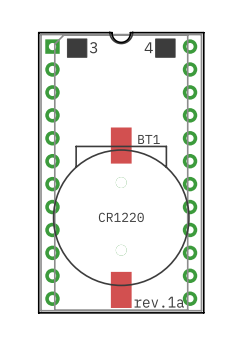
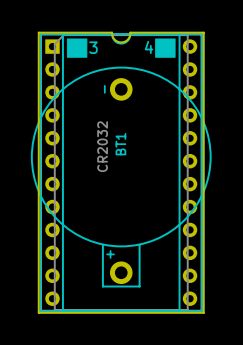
line: (109, 32) (113, 40) (121, 43) (129, 40) (132, 32) -> none
part footprint: [40, 34, 202, 312] -> [39, 33, 203, 312]
BT1 footprint: [53, 127, 190, 308] -> [31, 66, 212, 288]
BT1 name position: BT1 (149, 139) -> BT1 (120, 144)
BT1 value: CR1220 (121, 217) -> CR2032 (102, 146)
text: rev.1a (159, 302) -> none

